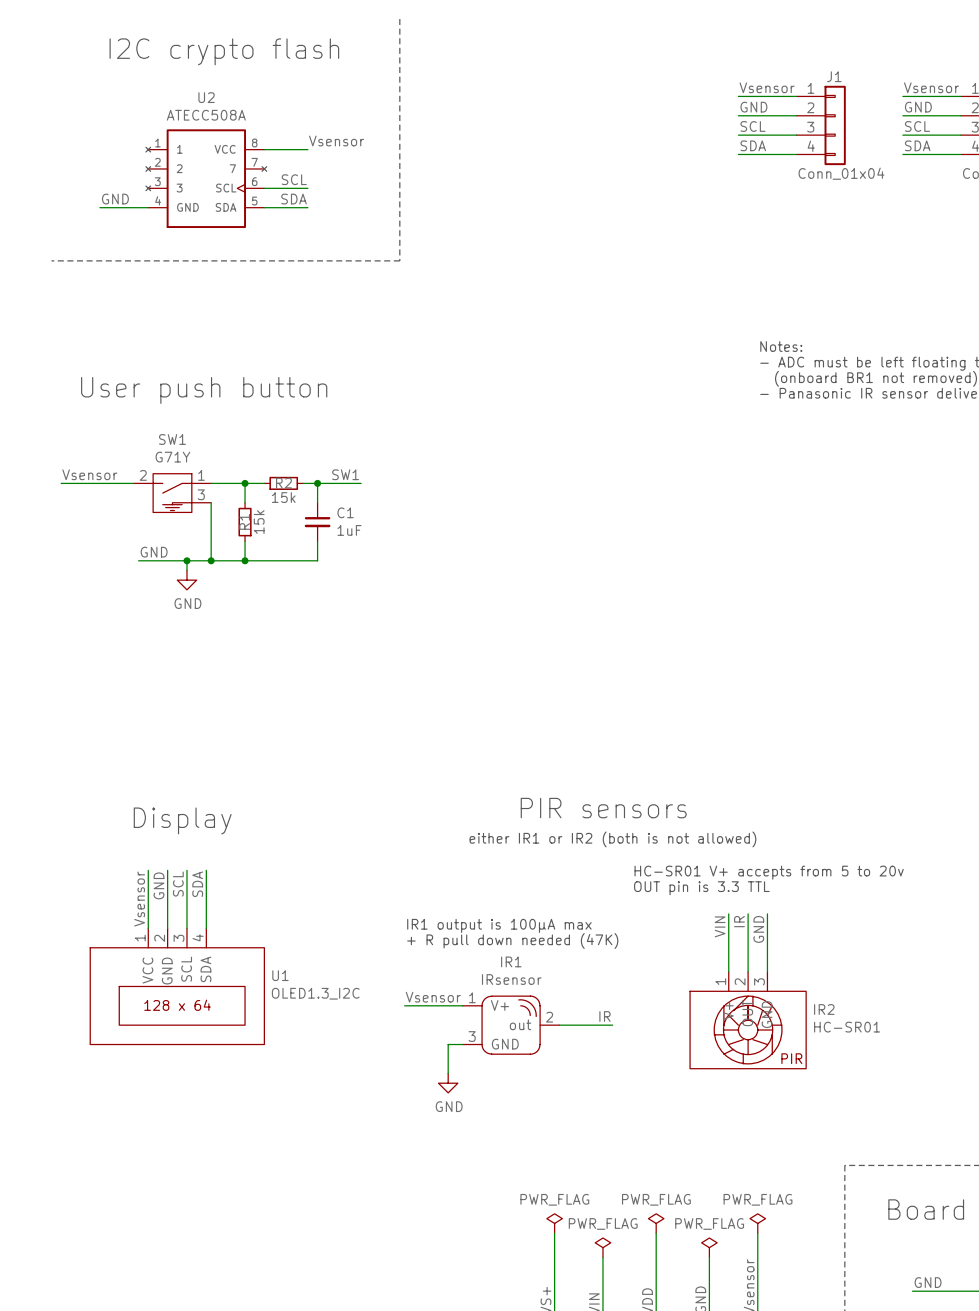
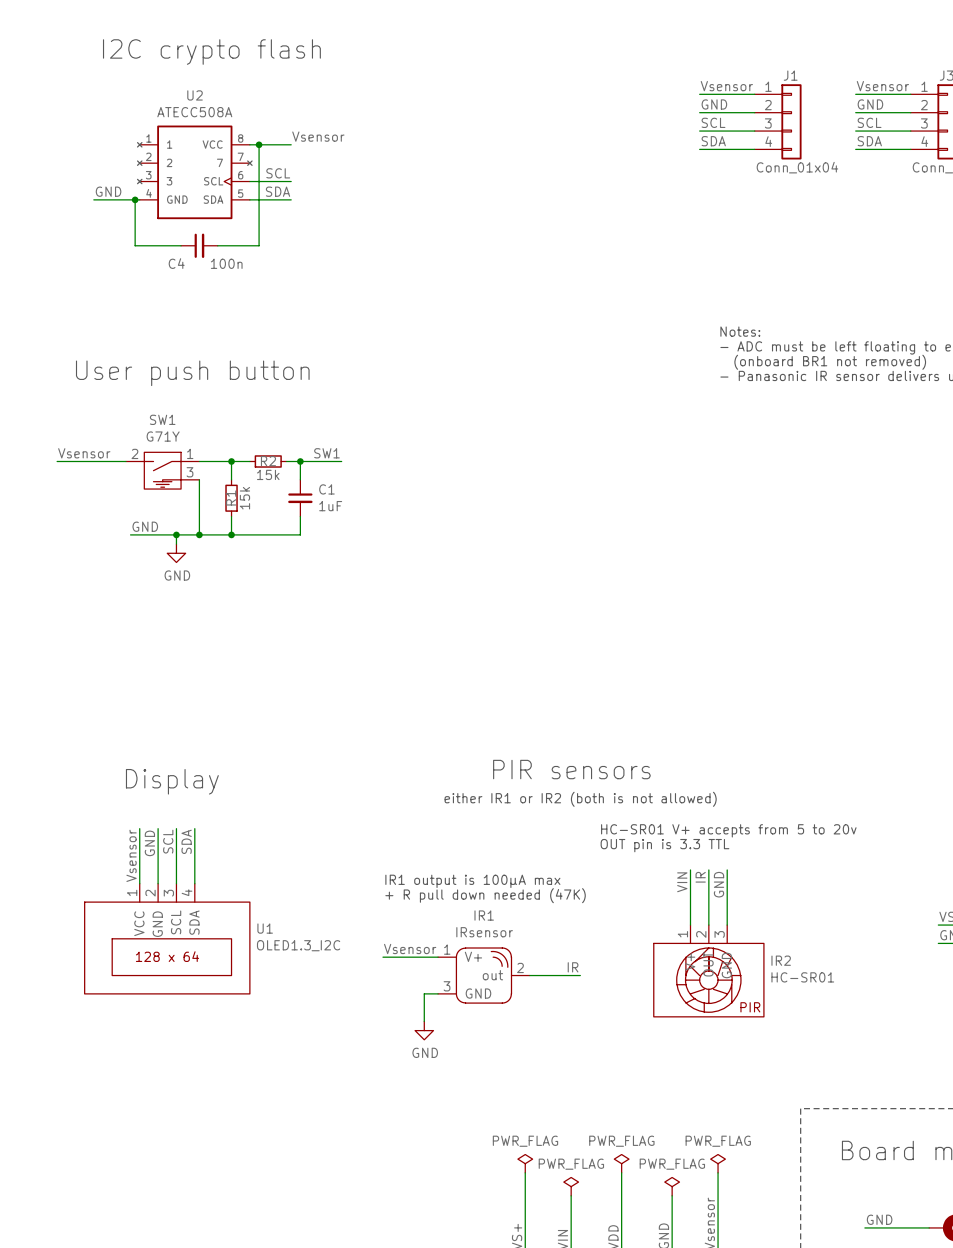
line: (399, 19) (399, 260) (51, 260) -> none
wire: none -> (259, 144) (259, 245) (217, 245)
junction: none -> (259, 144)
wire: none -> (135, 199) (135, 245) (181, 245)
junction: none -> (135, 199)
C4: none -> 100n (199, 245)

